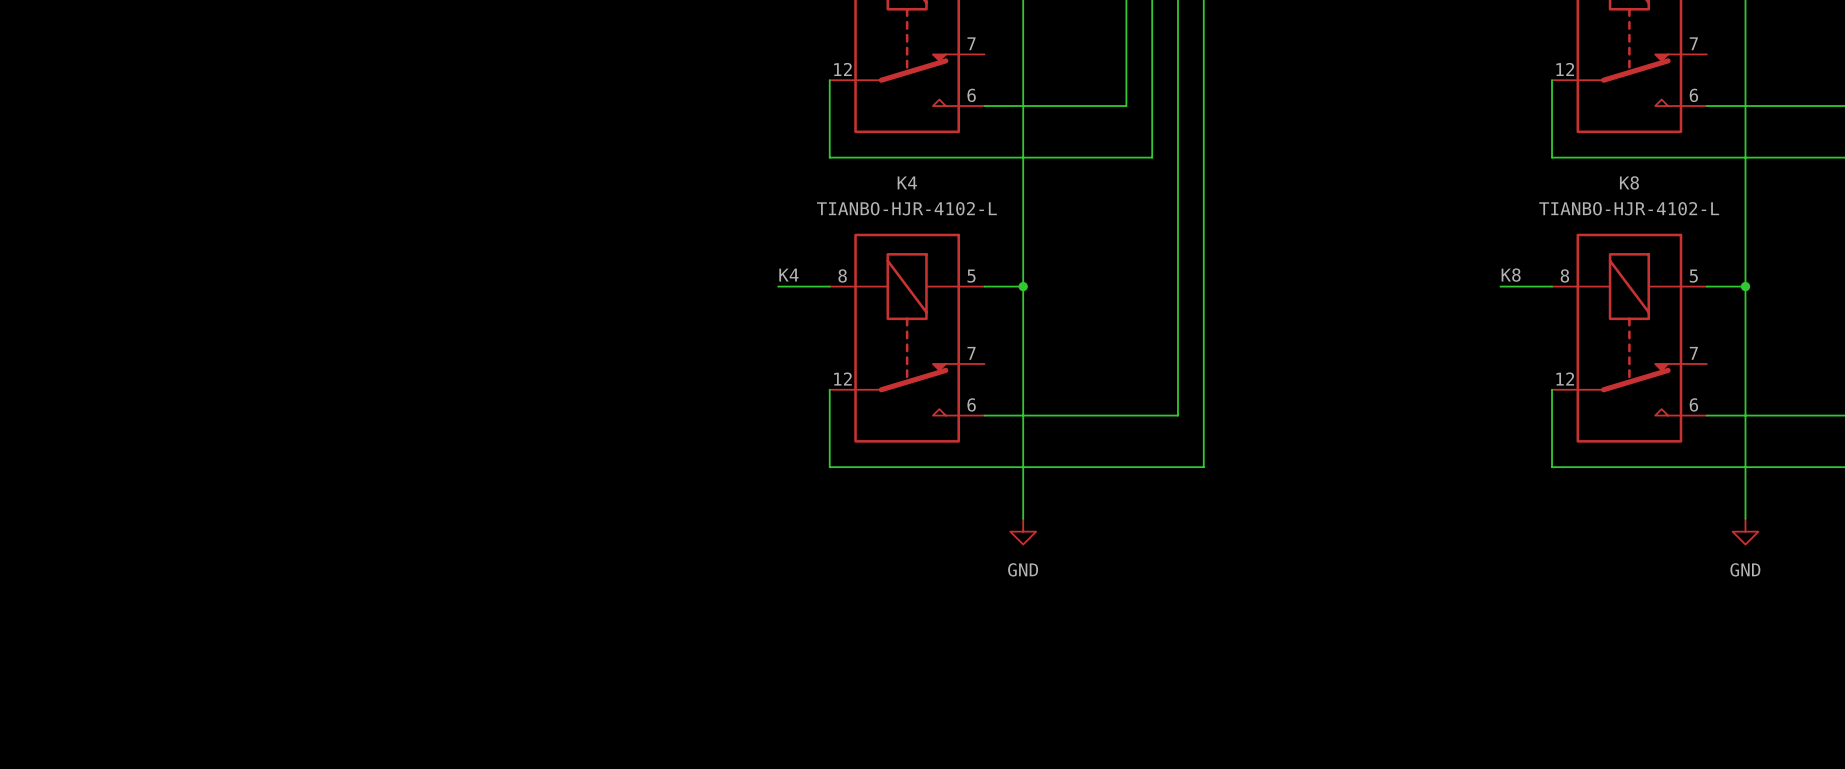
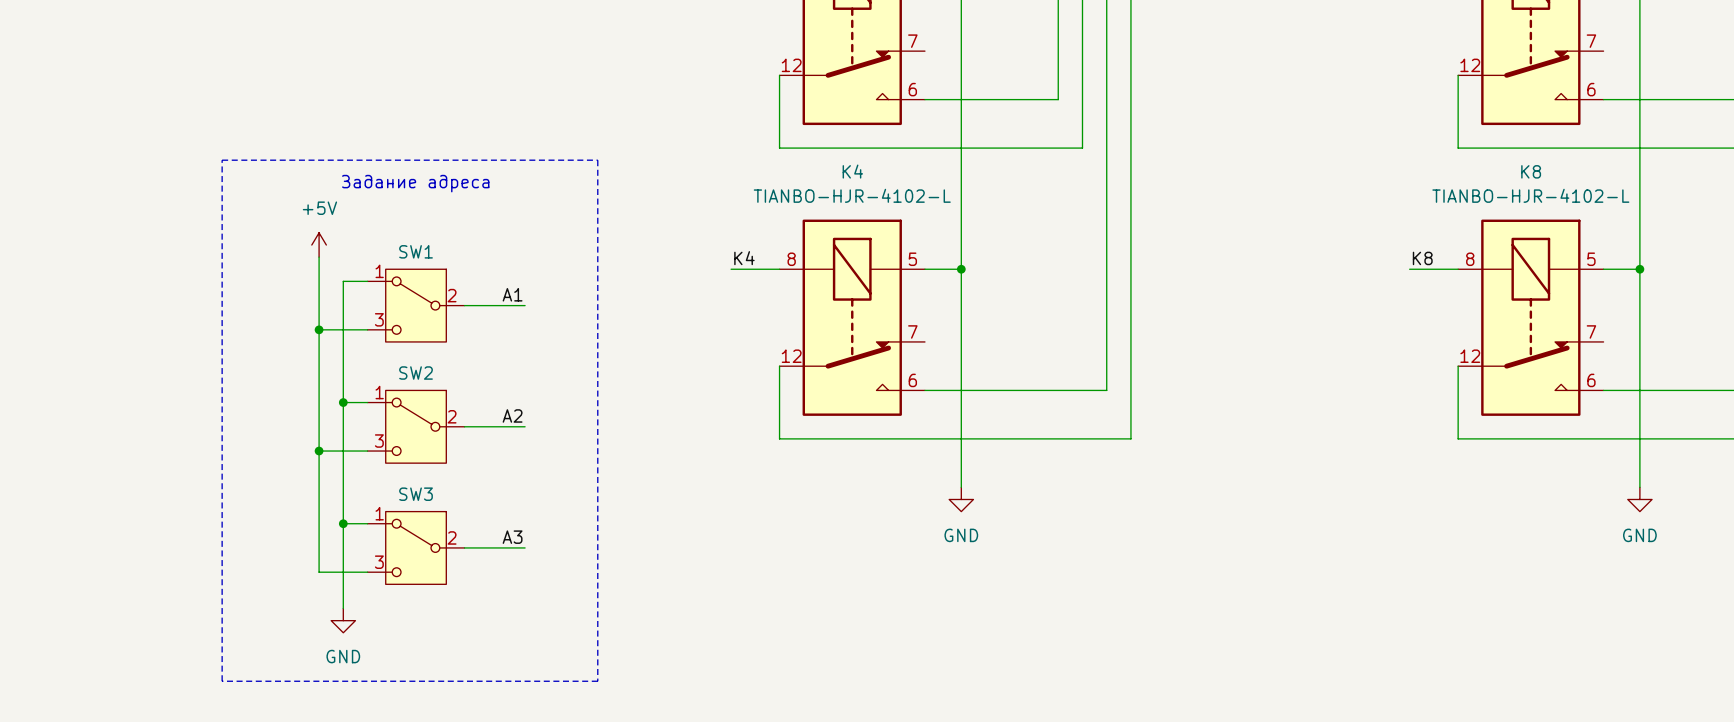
line: none -> (222, 160) (597, 160) (597, 681) (222, 681) (222, 160)
text: none -> Задание адреса (415, 183)
power symbol: none -> +5V (319, 245)
wire: none -> (319, 257) (319, 572) (367, 572)
wire: none -> (367, 281) (343, 281) (343, 608)
label: none -> A1 (512, 294)
SW1: none -> (416, 305)
wire: none -> (464, 305) (525, 305)
wire: none -> (319, 329) (367, 329)
junction: none -> (319, 329)
wire: none -> (343, 402) (367, 402)
junction: none -> (343, 402)
label: none -> A2 (512, 415)
SW2: none -> (416, 426)
wire: none -> (464, 426) (525, 426)
wire: none -> (319, 451) (367, 451)
junction: none -> (319, 451)
wire: none -> (343, 523) (367, 523)
junction: none -> (343, 523)
label: none -> A3 (512, 537)
SW3: none -> (416, 547)
wire: none -> (464, 547) (525, 547)
power symbol: none -> GND (343, 620)

